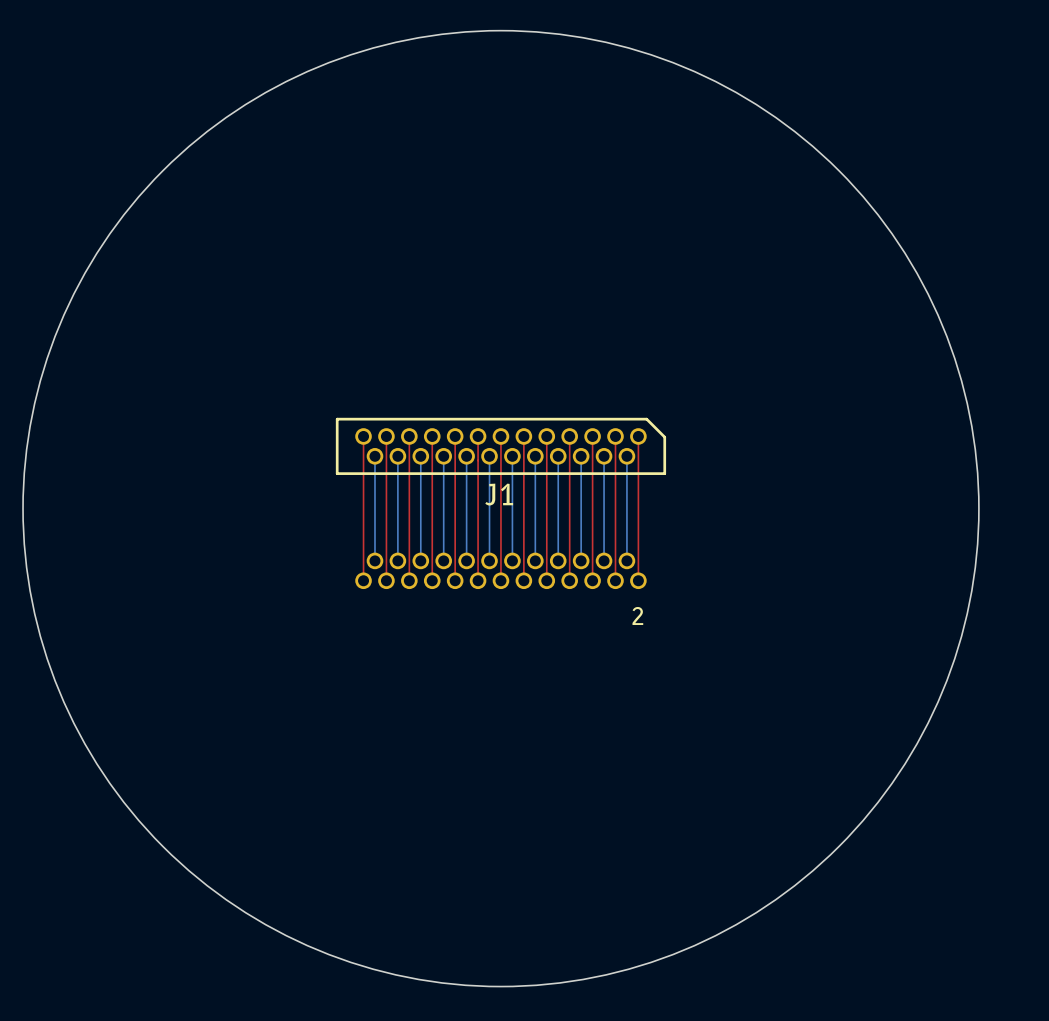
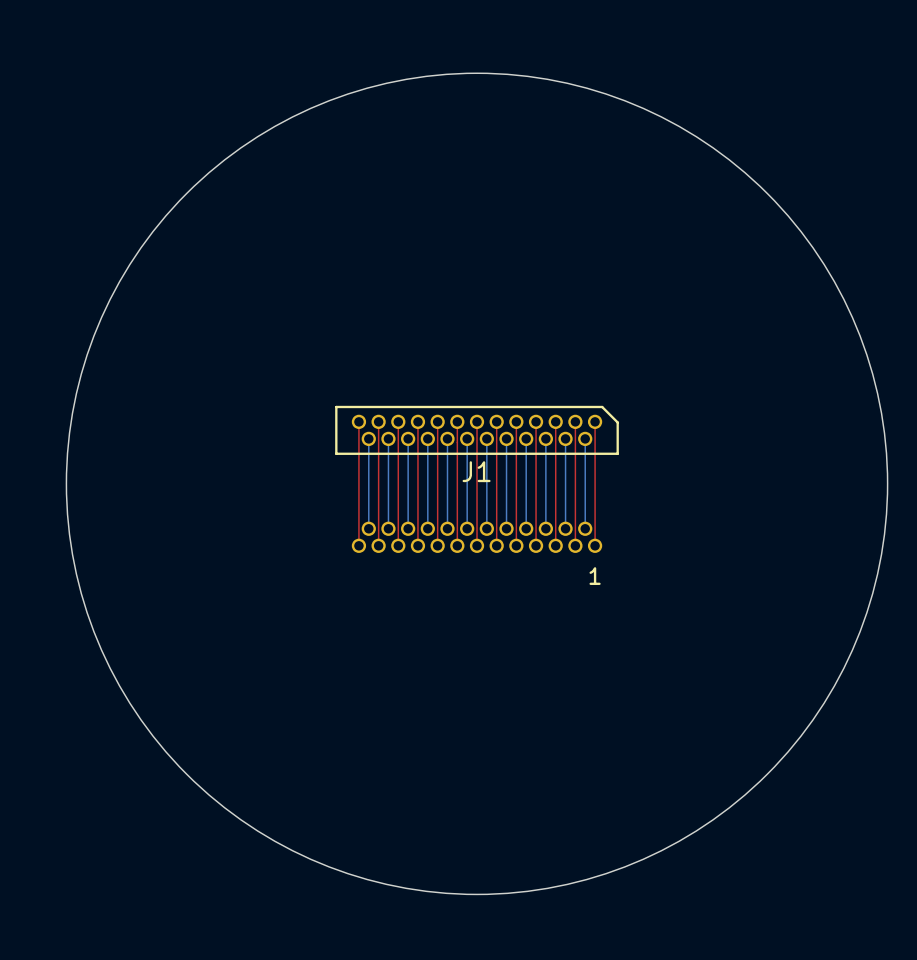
part text: 2 (637, 615) -> 1 (595, 576)

